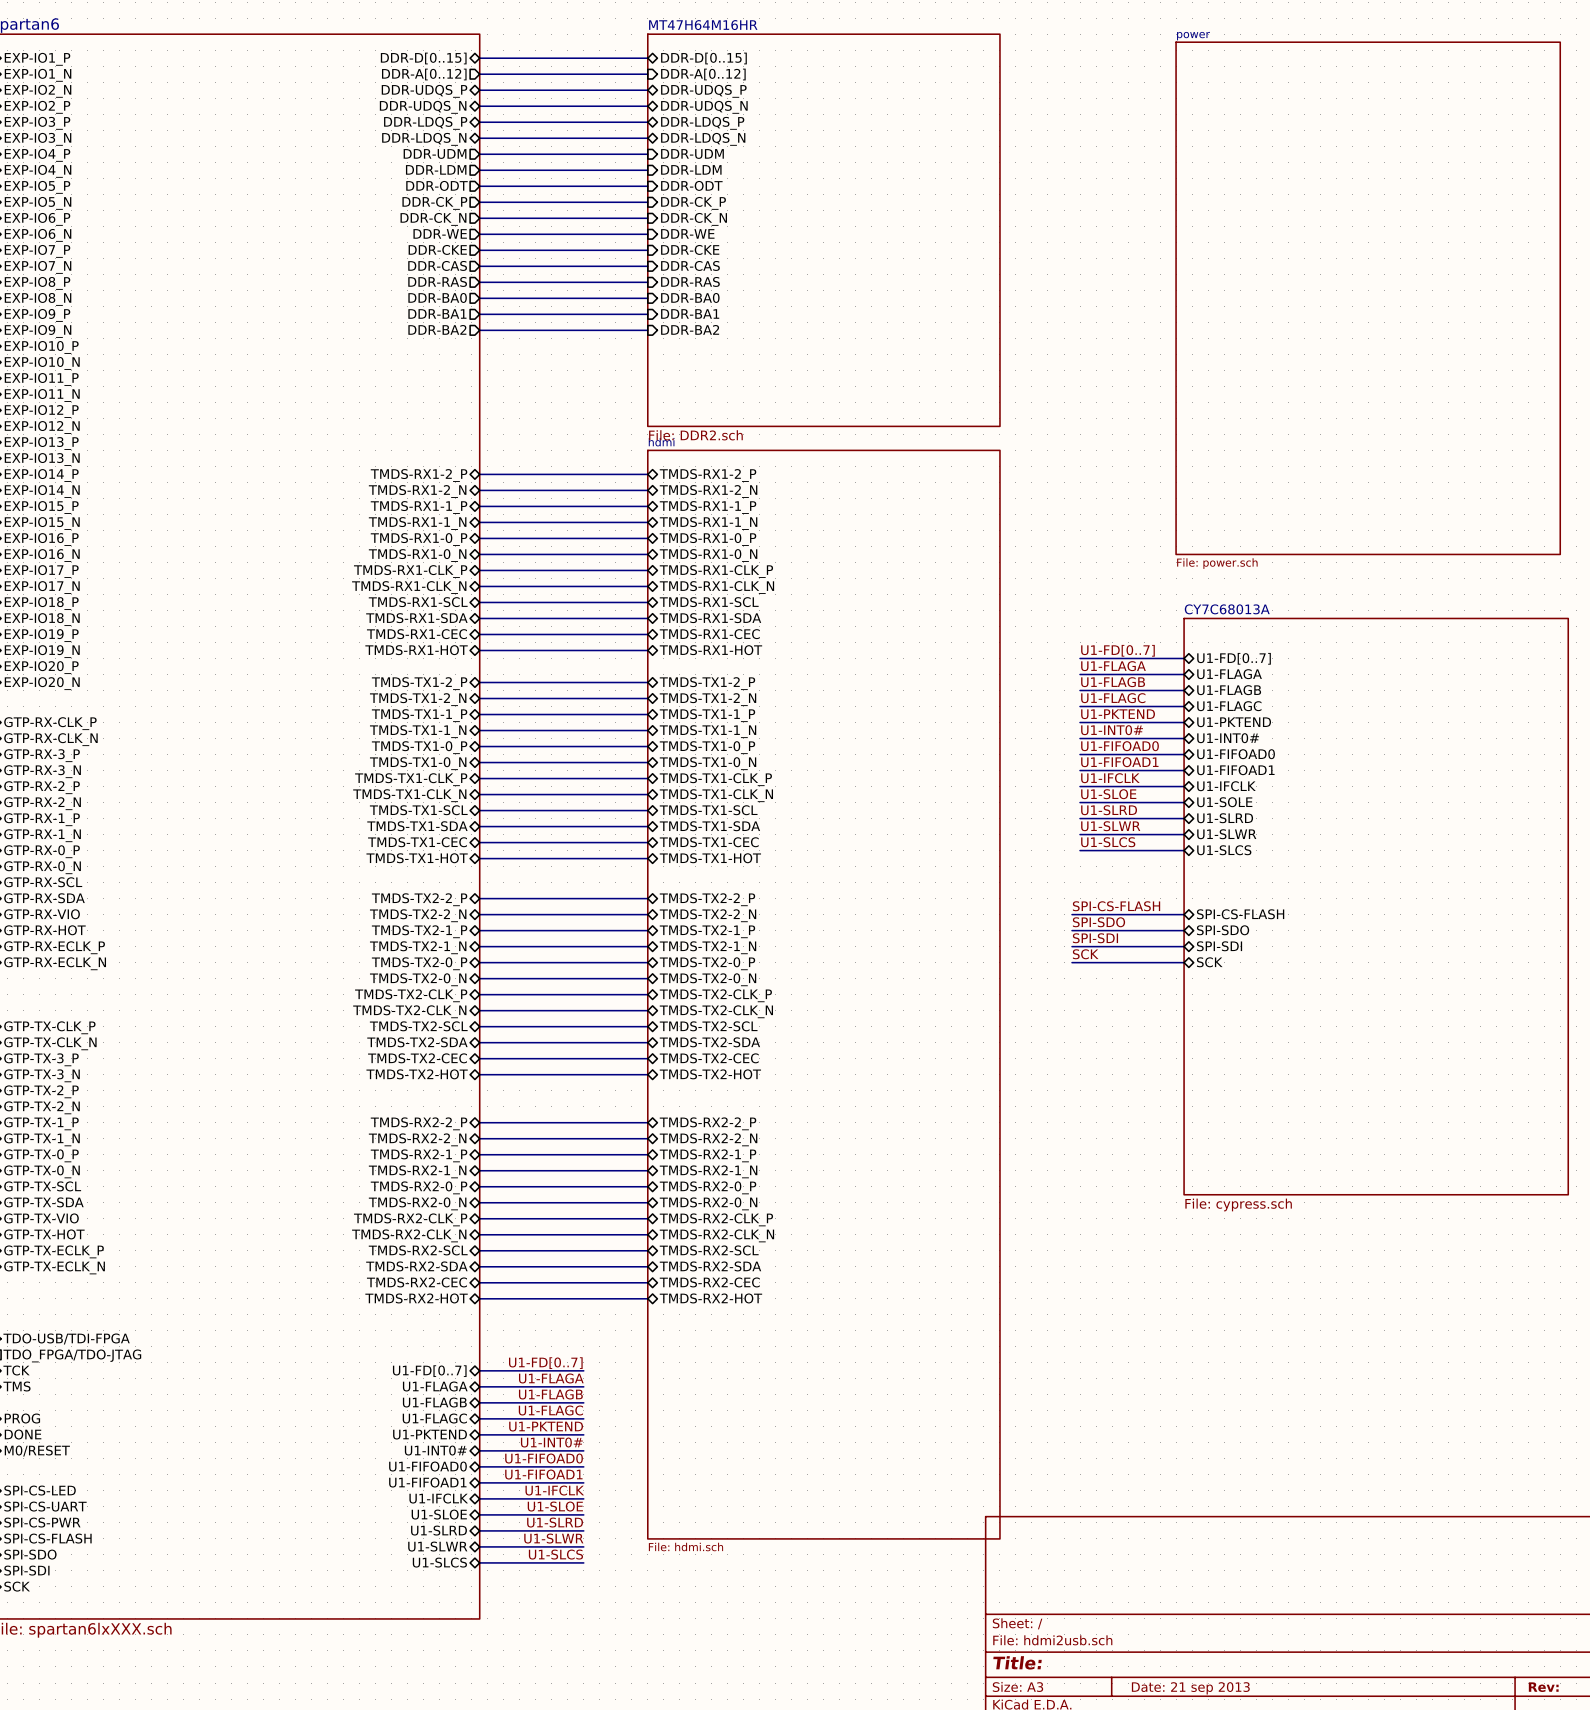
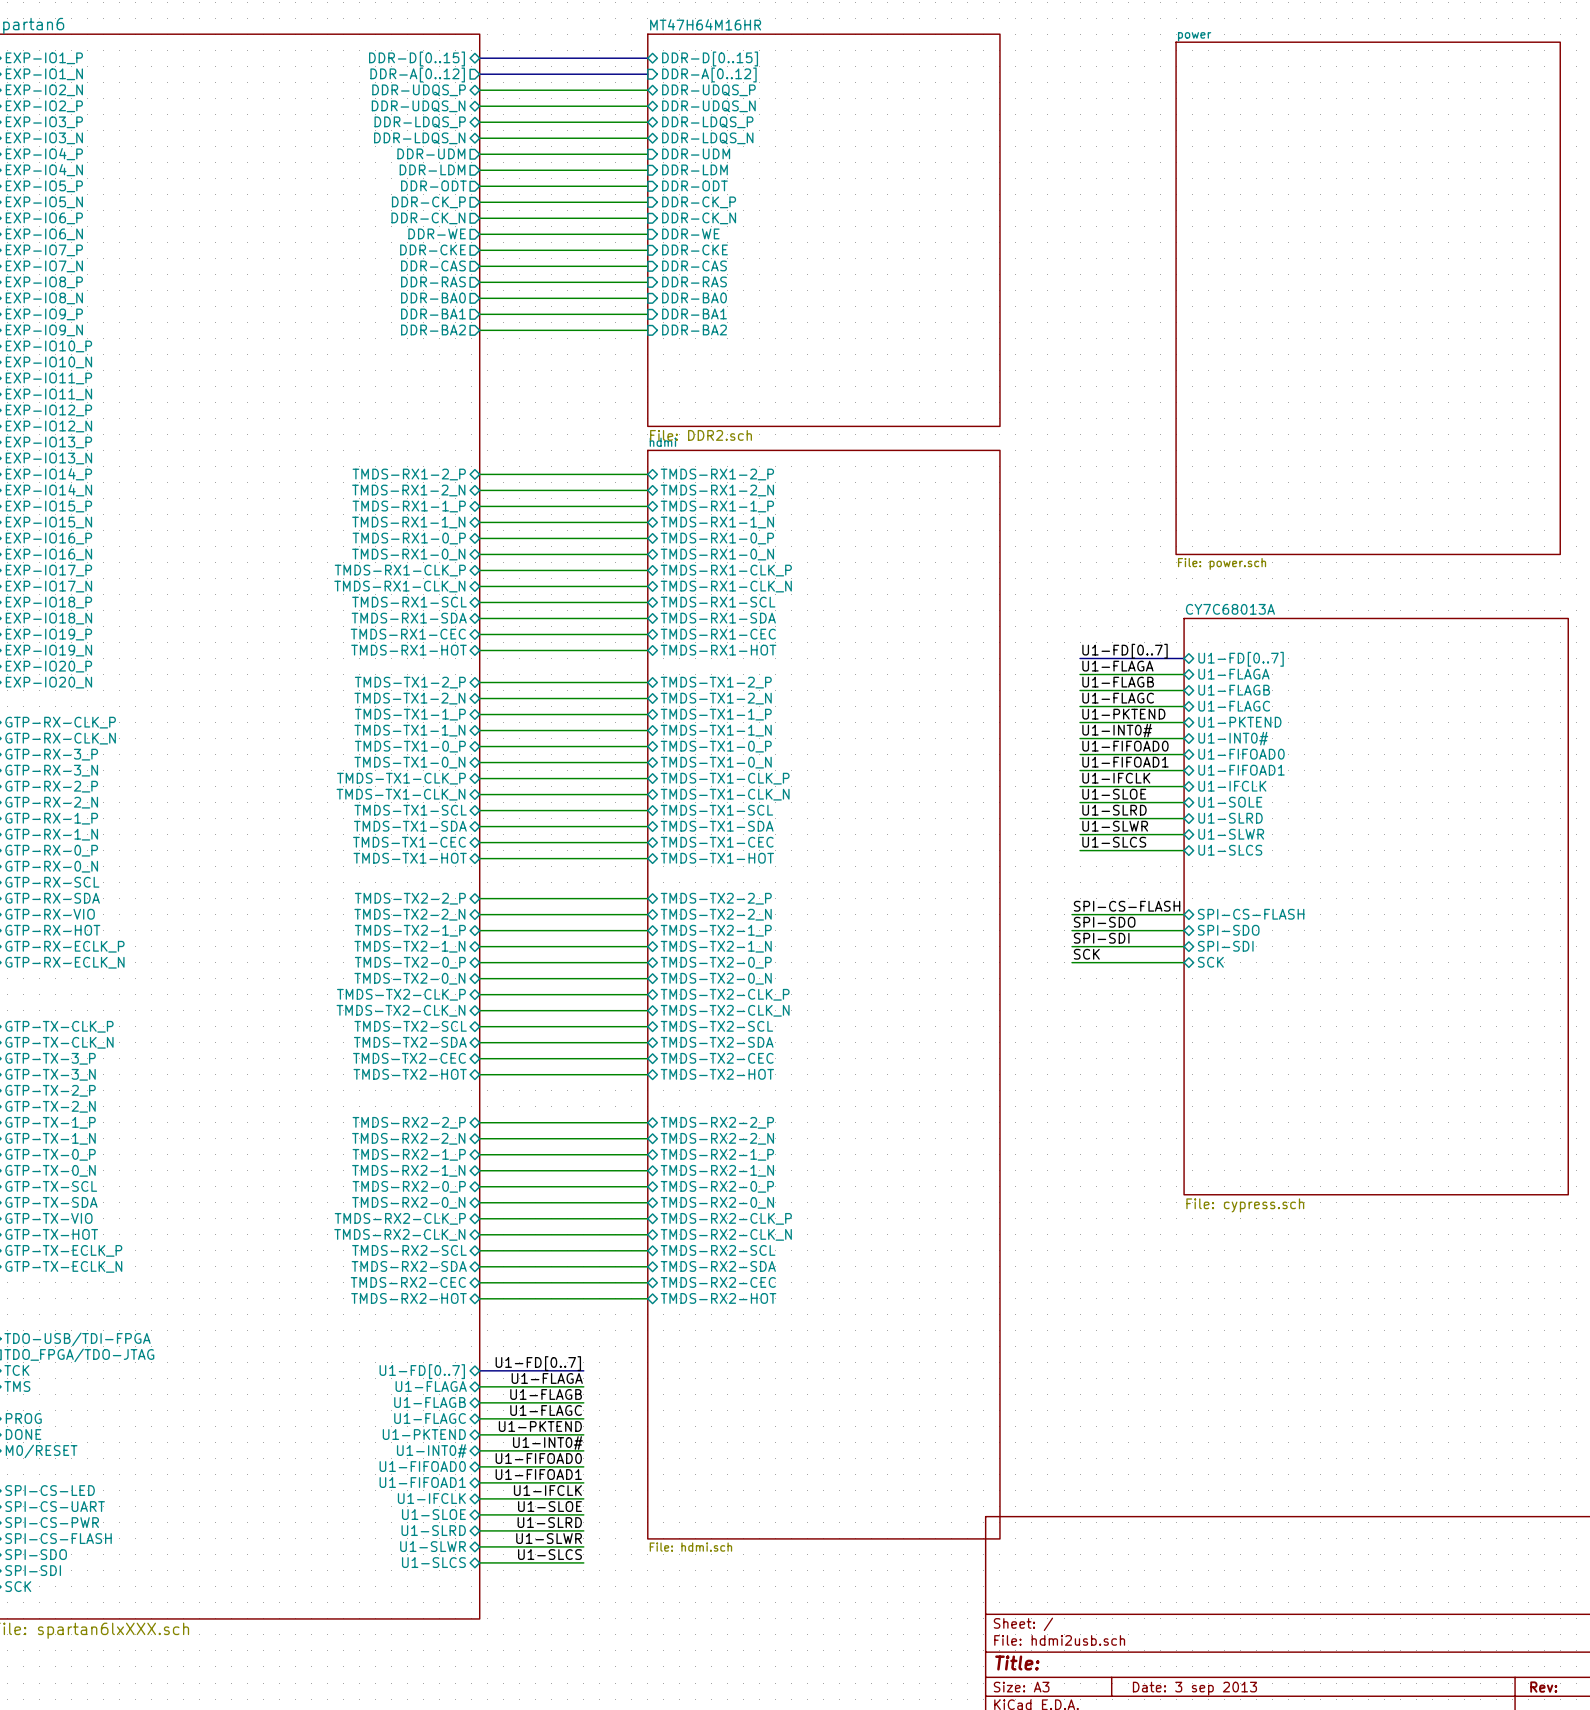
title block: Date: 21 sep 2013 (1190, 1688) -> Date: 3 sep 2013 (1194, 1688)

